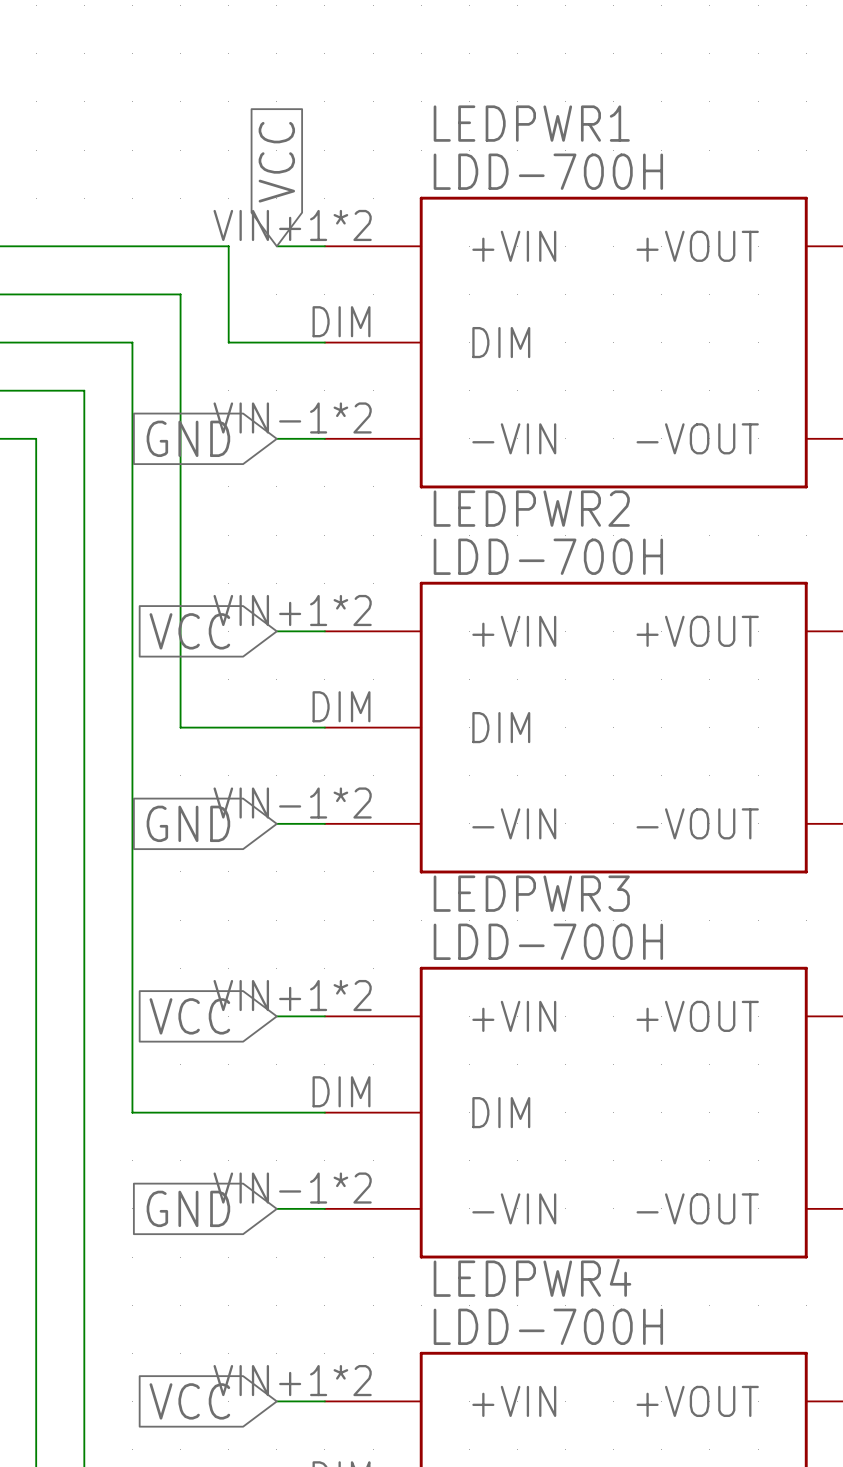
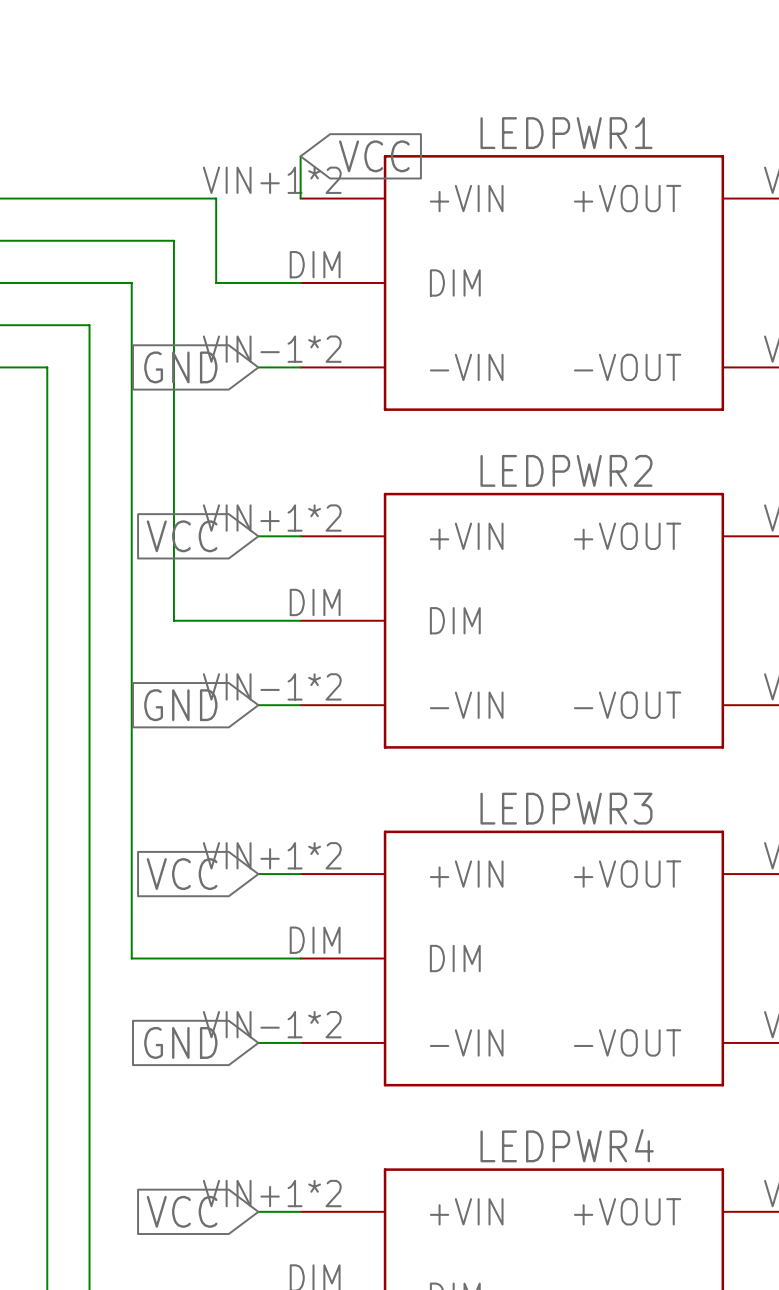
LEDPWR1 name position: LEDPWR1 (531, 123) -> LEDPWR1 (566, 133)
global label rotation: 0° (276, 162) -> 90° clockwise (374, 156)
LEDPWR1 value: LDD-700H (548, 171) -> none
wire: (276, 246) (324, 246) -> (300, 156) (300, 198)
LEDPWR2 name position: LEDPWR2 (531, 508) -> LEDPWR2 (566, 470)
LEDPWR2 value: LDD-700H (548, 556) -> none
LEDPWR3 name position: LEDPWR3 (531, 893) -> LEDPWR3 (566, 808)
LEDPWR3 value: LDD-700H (548, 941) -> none
LEDPWR4 name position: LEDPWR4 (532, 1277) -> LEDPWR4 (567, 1145)
LEDPWR4 value: LDD-700H (548, 1326) -> none

